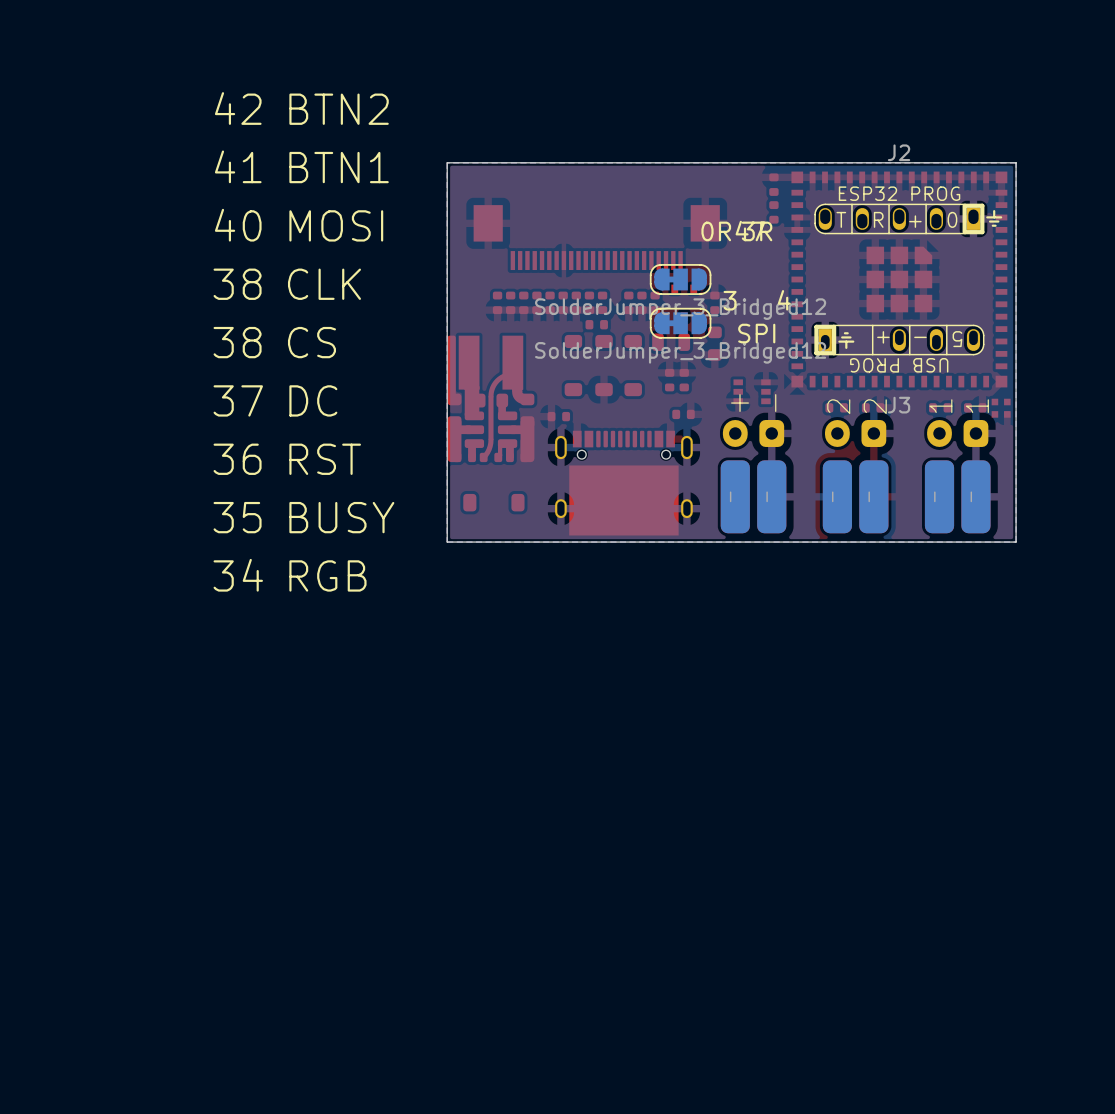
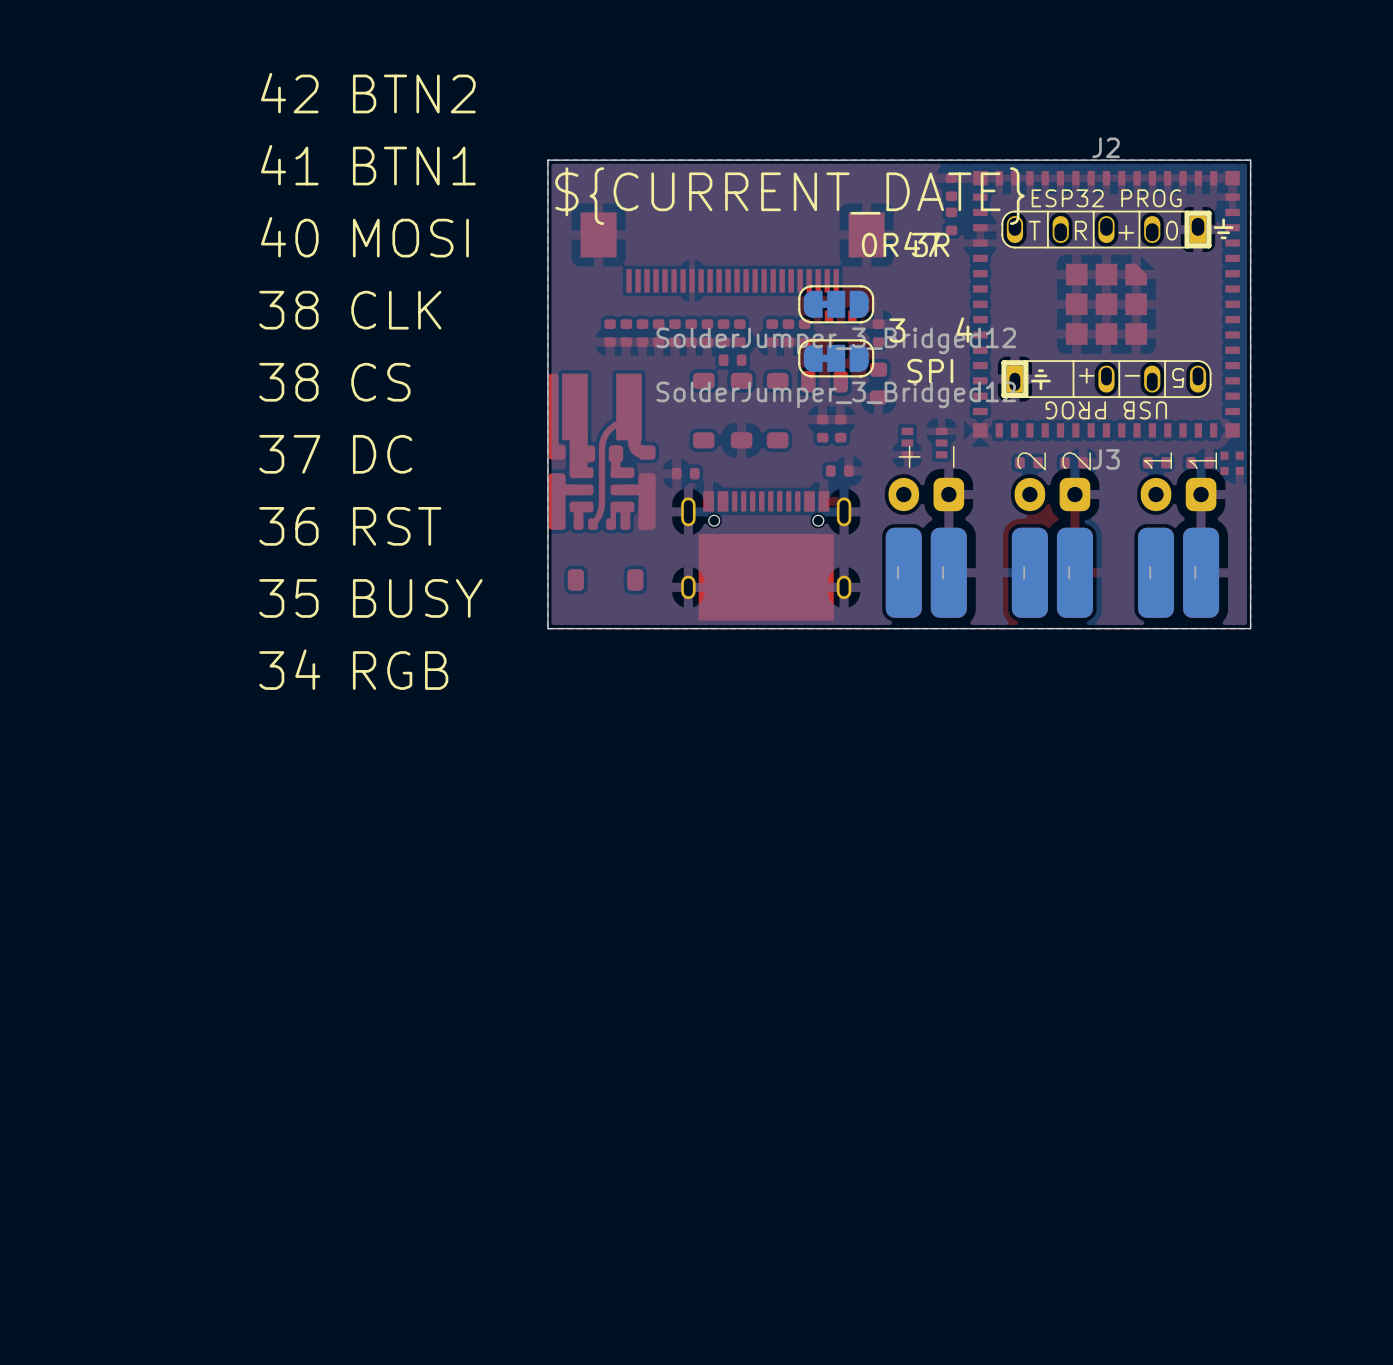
text: none -> ${CURRENT_DATE} (789, 196)

